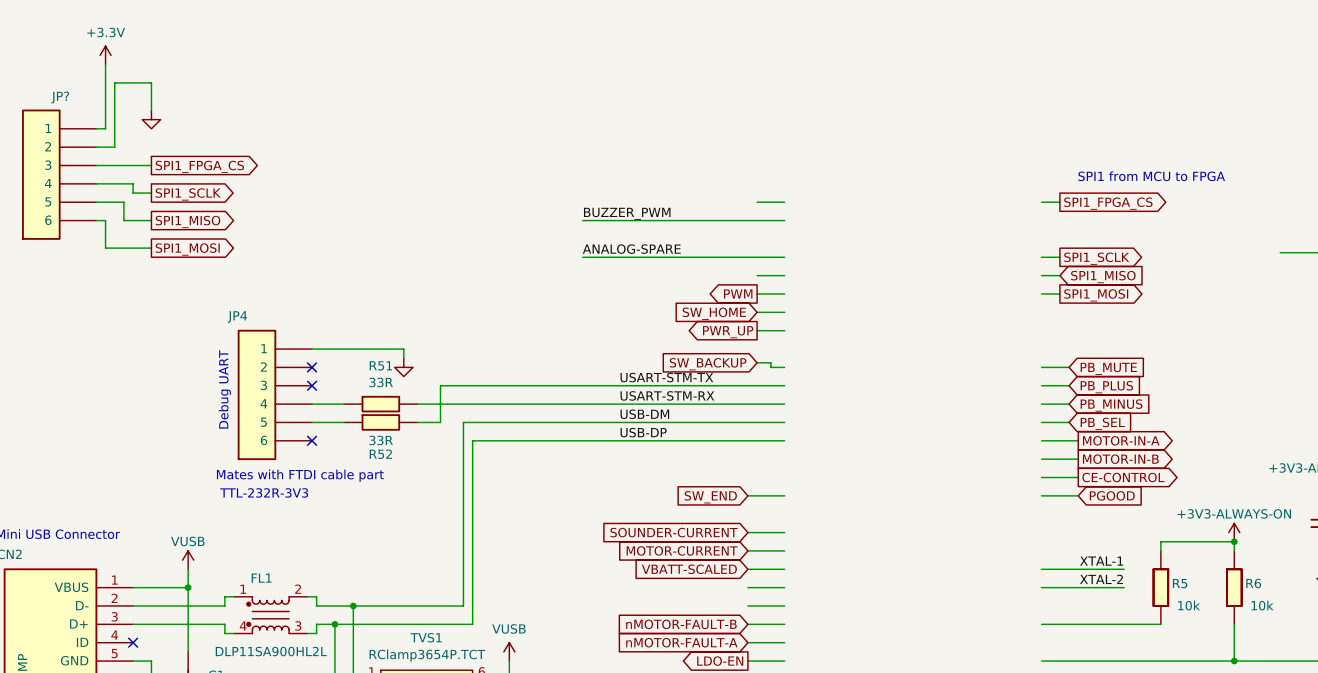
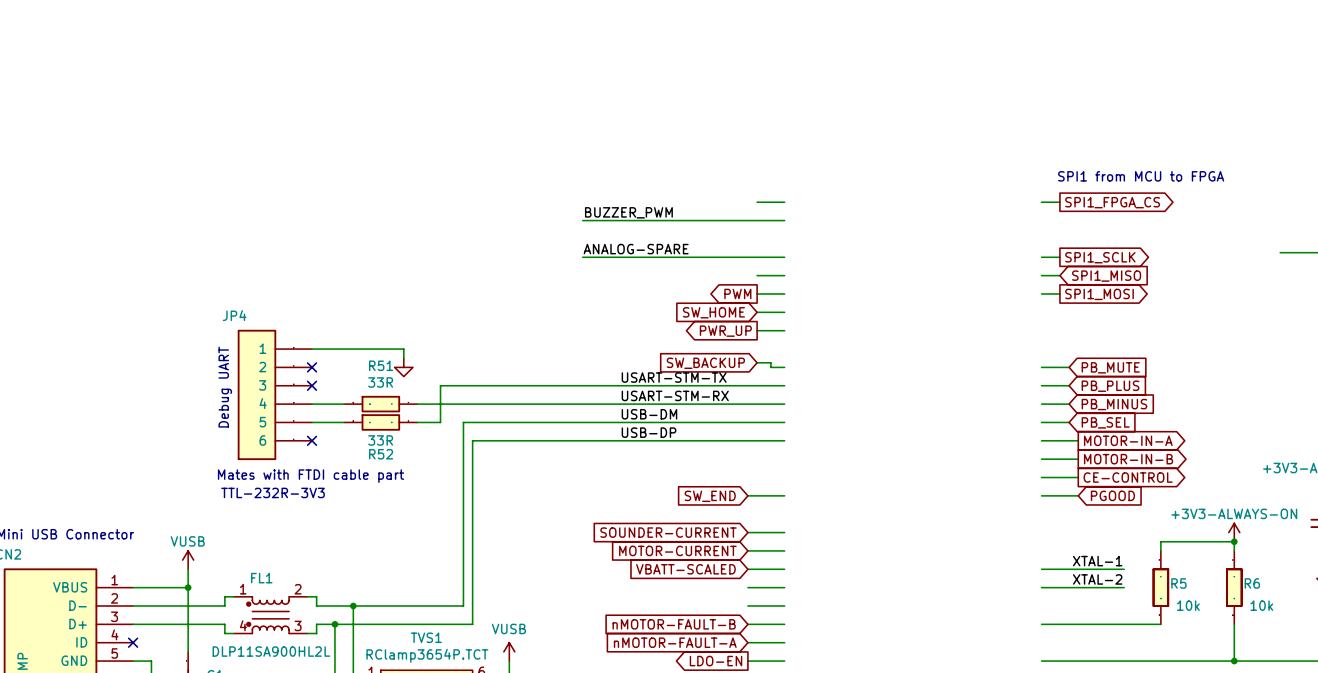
power symbol: +3.3V (105, 55) -> none
wire: (105, 64) (105, 128) (96, 128) -> none
wire: (151, 110) (151, 82) (114, 82) (114, 147) (96, 147) -> none
power symbol: (151, 119) -> none
wire: (96, 165) (151, 165) -> none
global label: SPI1_FPGA_CS (199, 166) -> none
JP?: (59, 174) -> none
wire: (96, 183) (133, 183) (133, 193) (151, 193) -> none
global label: SPI1_SCLK (188, 194) -> none
wire: (96, 202) (123, 202) (123, 220) (151, 220) -> none
wire: (96, 220) (105, 220) (105, 248) (151, 248) -> none
global label: SPI1_MISO (187, 221) -> none
global label: SPI1_MOSI (187, 249) -> none

